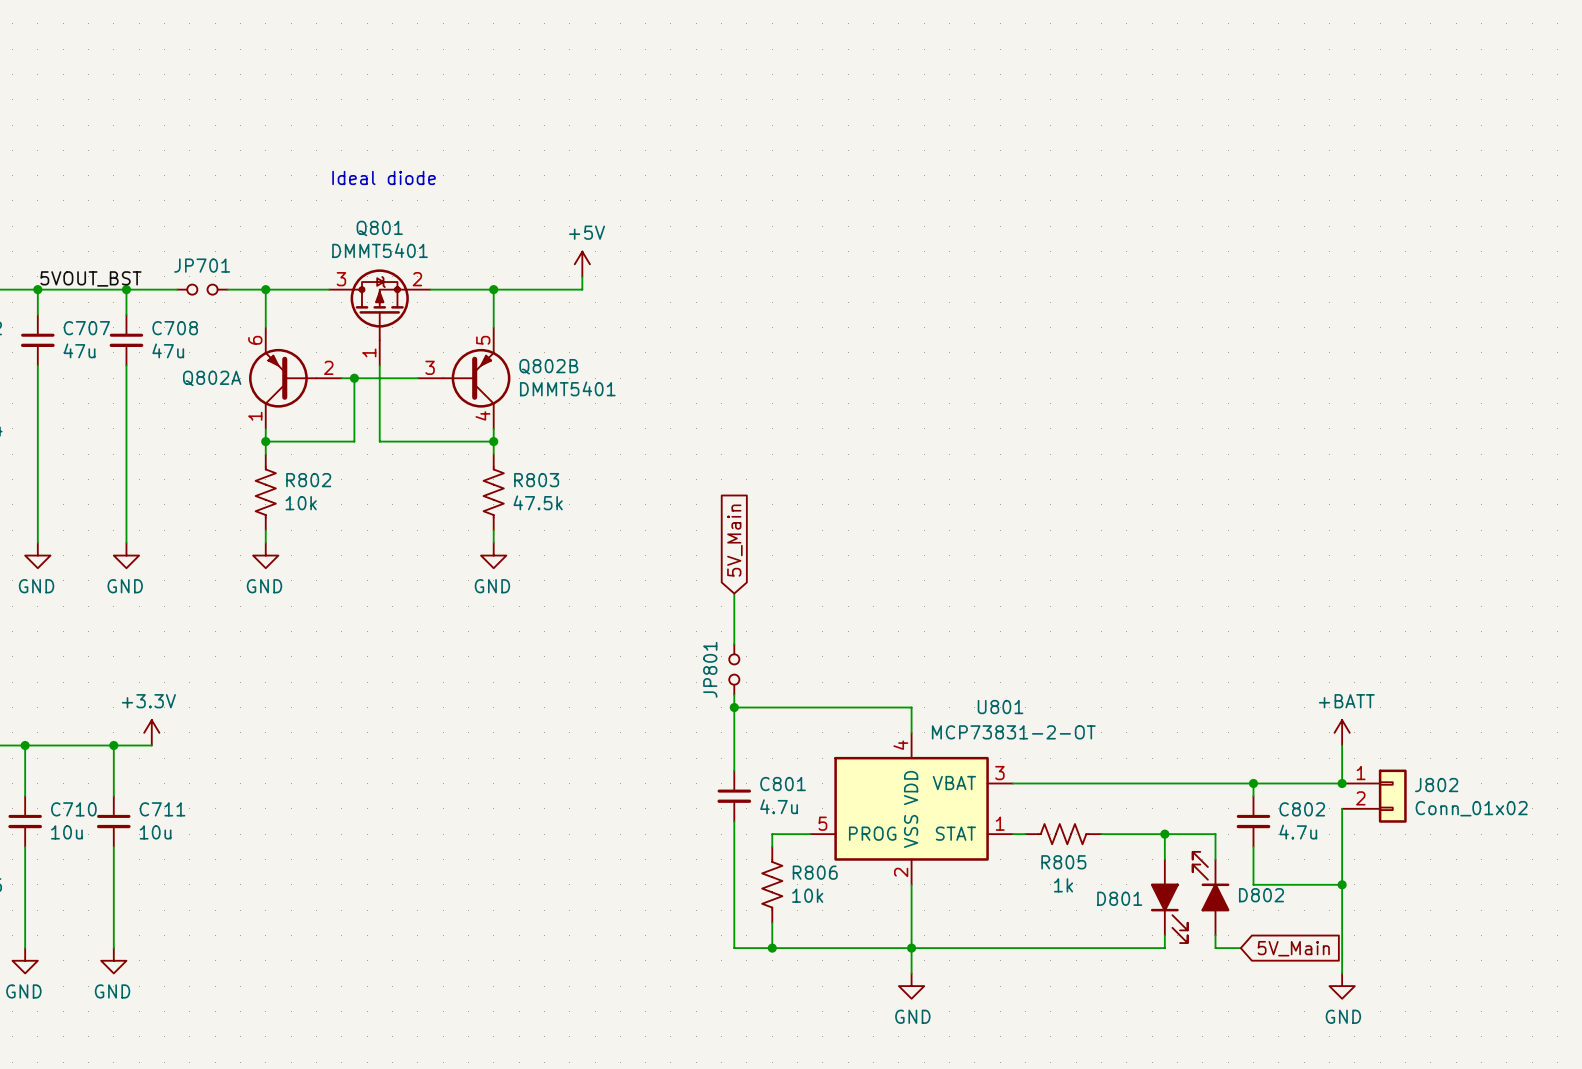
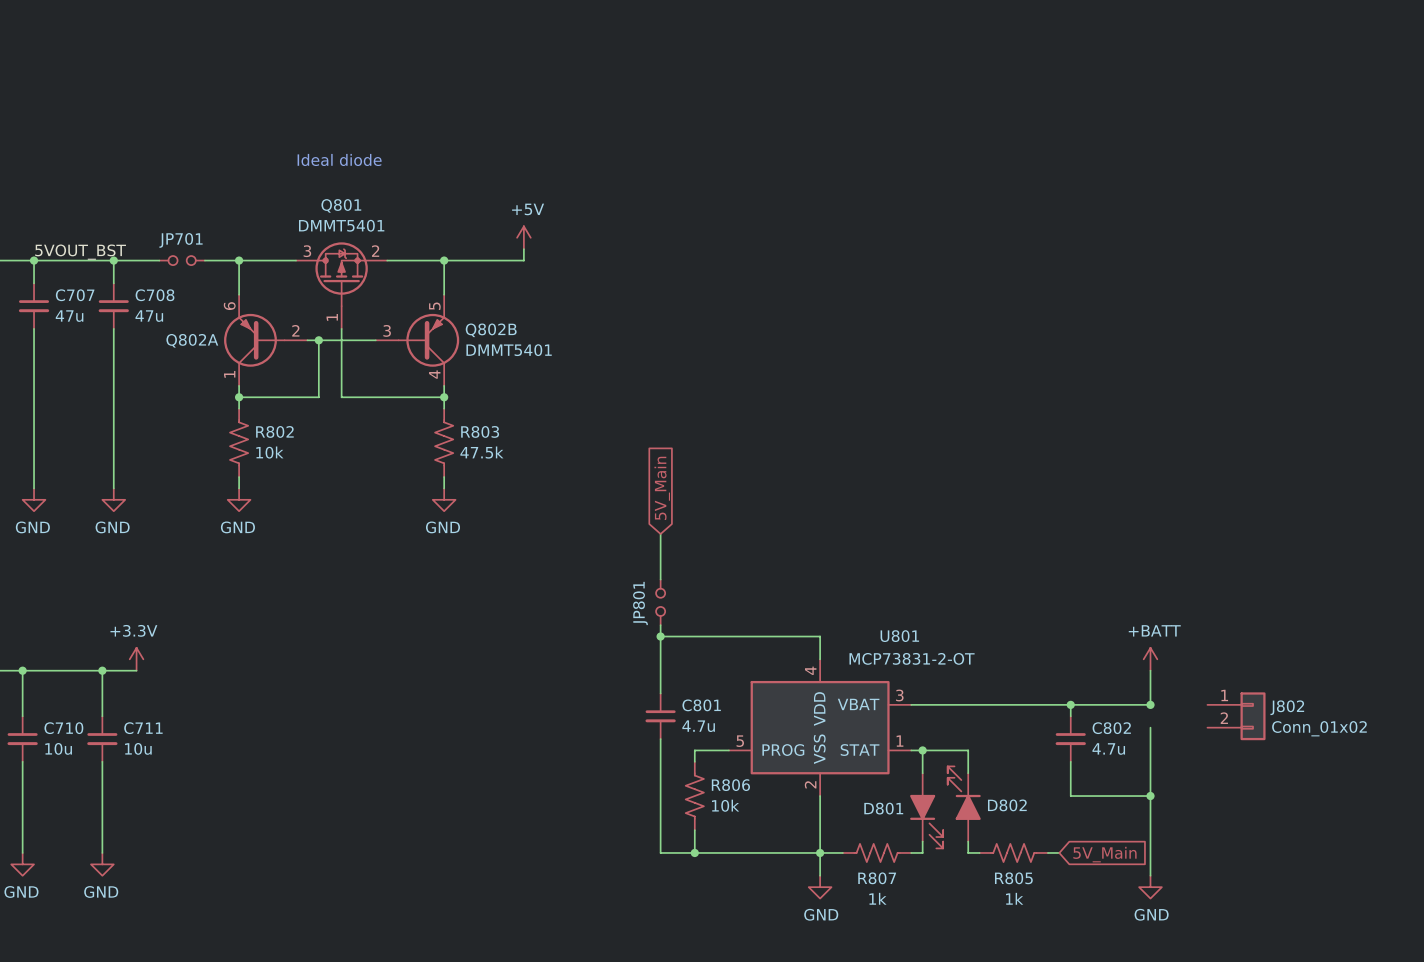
power symbol position: +BATT (1342, 732) -> +BATT (1150, 659)
wire: (1342, 745) (1342, 783) (1278, 783) -> (1150, 670) (1150, 704)
junction: none -> (1070, 704)
wire: (1253, 783) (1253, 796) -> (1070, 704) (1070, 716)
junction position: (1253, 783) -> (1150, 704)
junction: (1342, 783) -> none
wire: (1342, 808) (1342, 973) -> (1150, 727) (1150, 875)
C802 position: (1253, 821) -> (1070, 739)
junction: none -> (922, 750)
R805 position: (1063, 834) -> (1013, 852)
wire: (1101, 834) (1215, 834) (1215, 859) -> none
wire: (1164, 834) (1164, 859) -> none
junction: (1164, 834) -> none
wire: (1253, 846) (1253, 884) -> (1070, 761) (1070, 796) (1127, 796)
wire: none -> (922, 773) (922, 750) (968, 750) (968, 773)
wire: (1278, 884) (1342, 884) -> none
junction: none -> (1150, 796)
junction: (1342, 884) -> none
D802 position: (1211, 893) -> (964, 803)
D801 position: (1169, 901) -> (926, 810)
wire: none -> (968, 841) (968, 852)
wire: (1164, 935) (1164, 948) (1088, 948) -> none
wire: (1215, 935) (1215, 948) (1240, 948) -> none
R807: none -> 1k (877, 852)
wire: (1025, 948) (1076, 948) -> (922, 852) (922, 841)
wire: none -> (1047, 852) (1059, 852)
global label position: 5V_Main (1293, 948) -> 5V_Main (1104, 854)
power symbol position: GND (1342, 986) -> GND (1150, 887)

